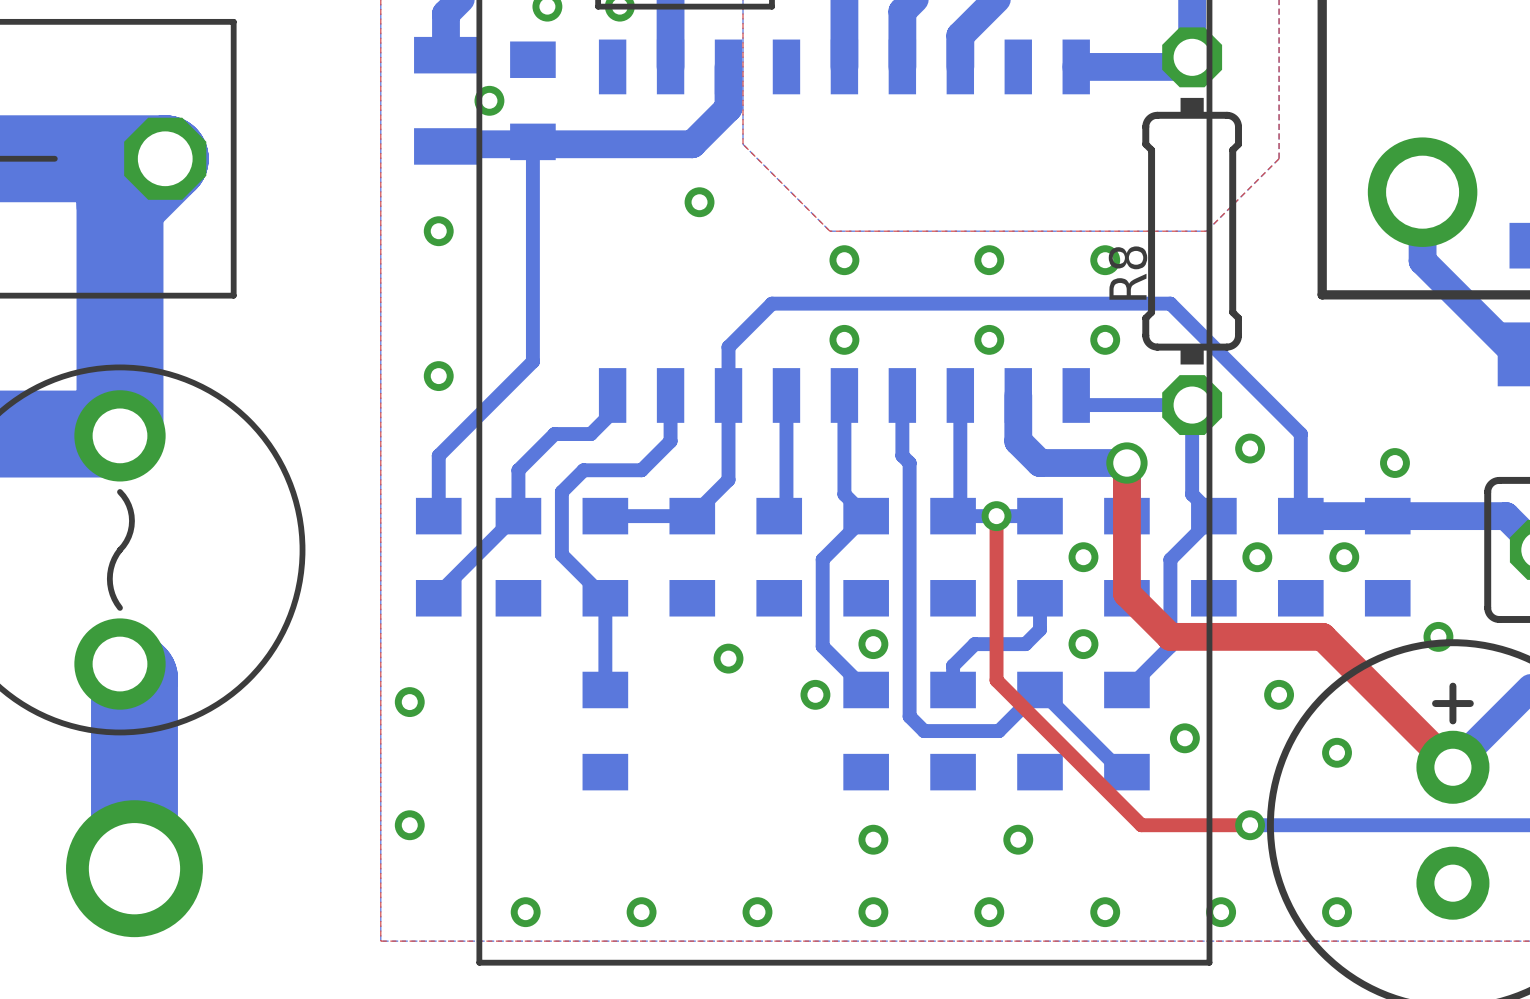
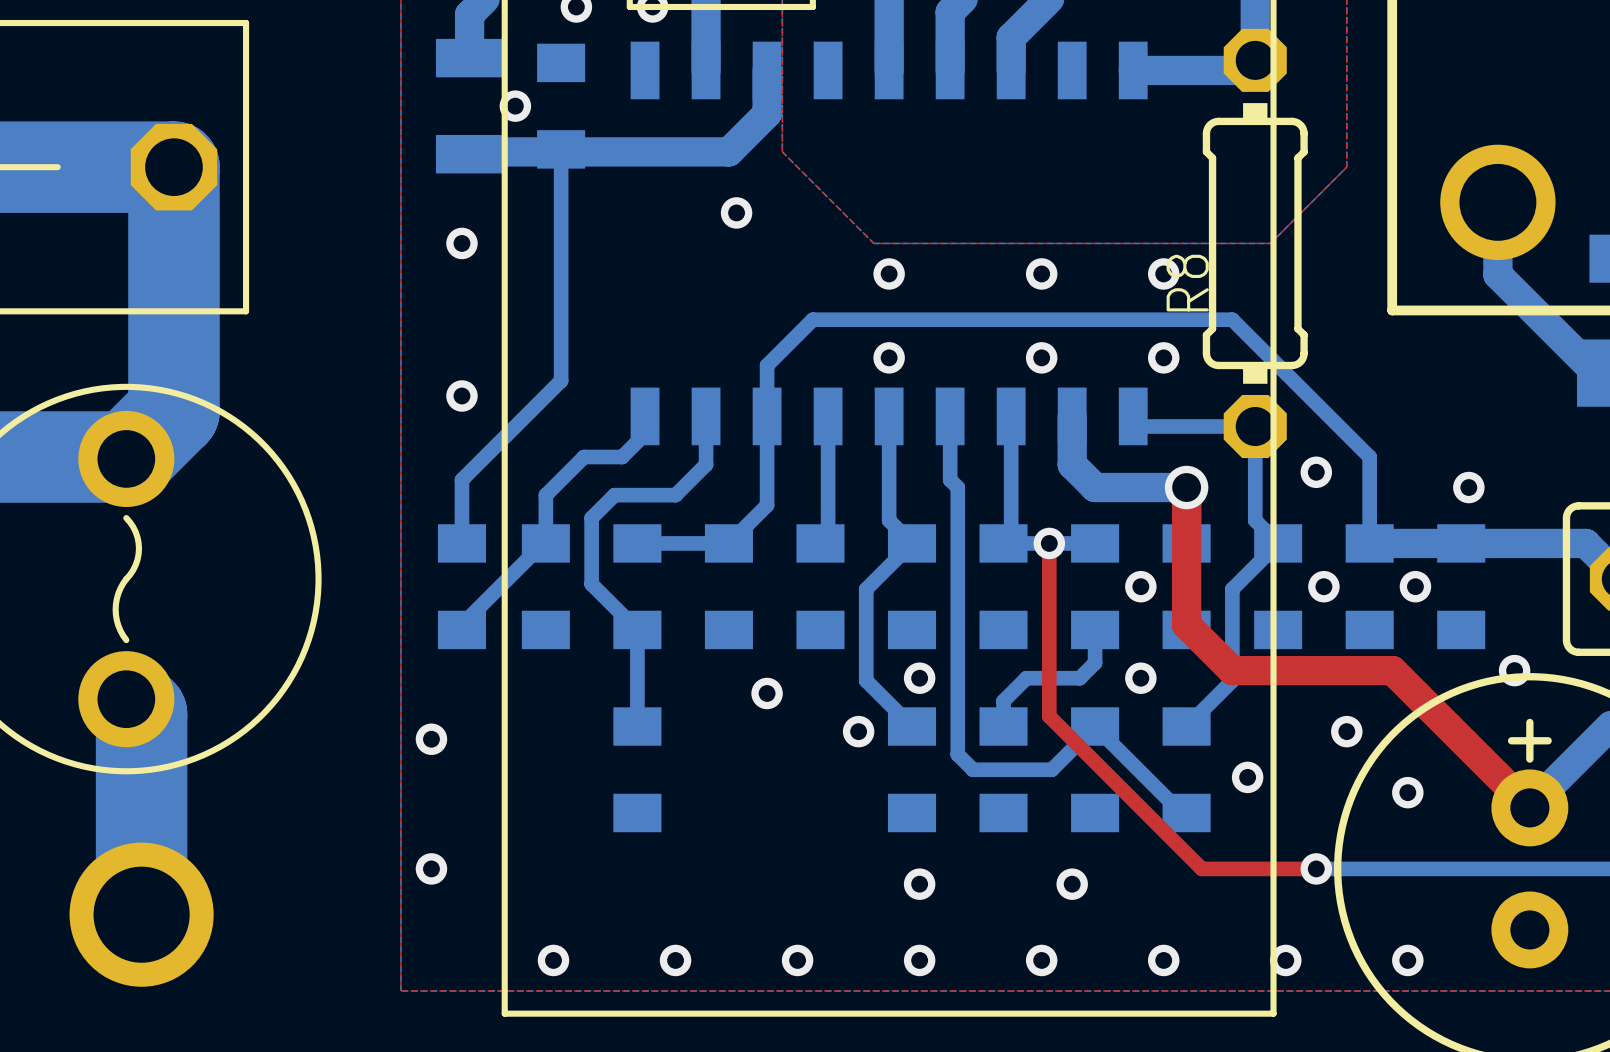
bottom track: (165, 158) (119, 204) (119, 435) -> (173, 167) (173, 411) (126, 458)

